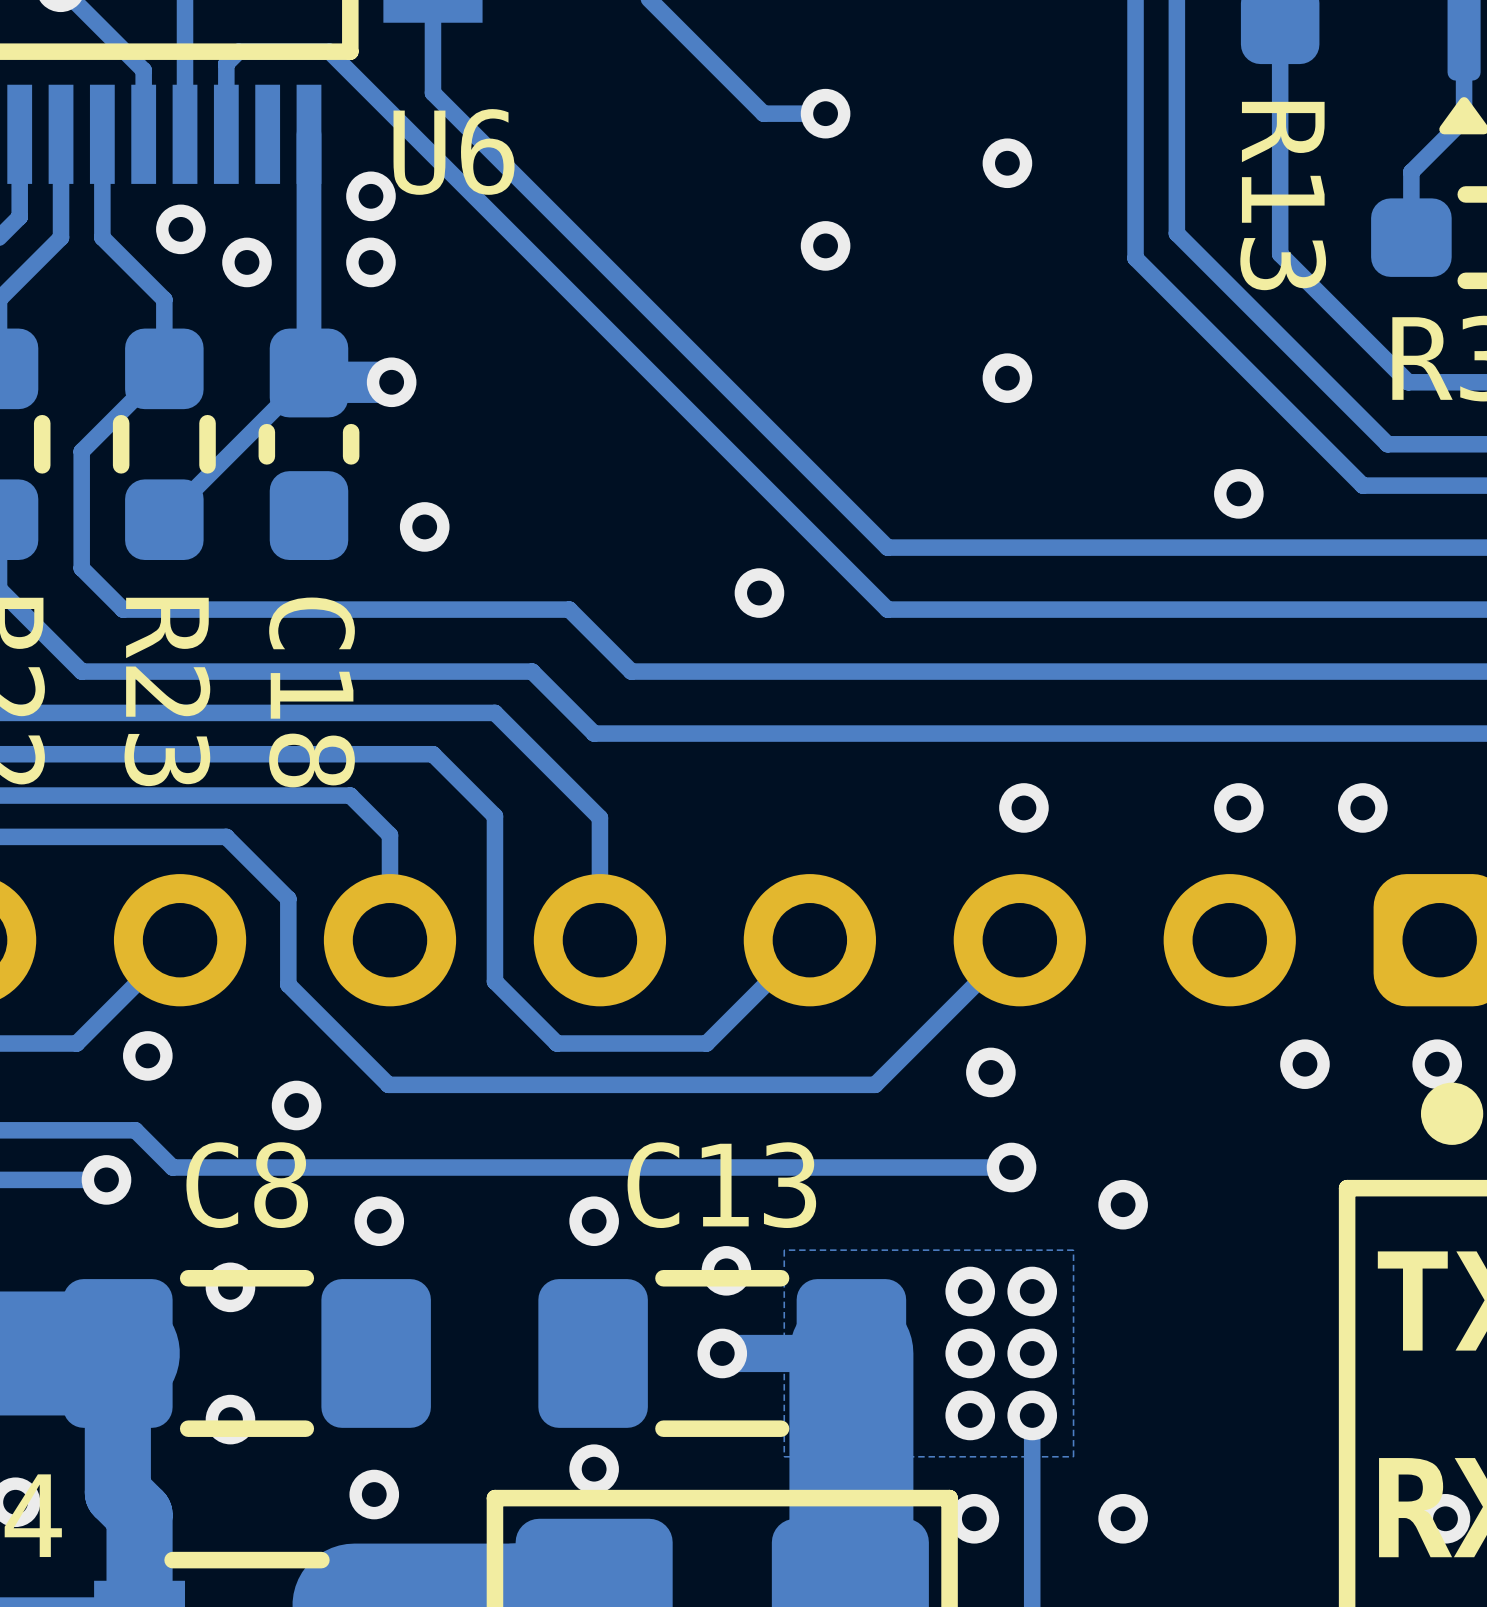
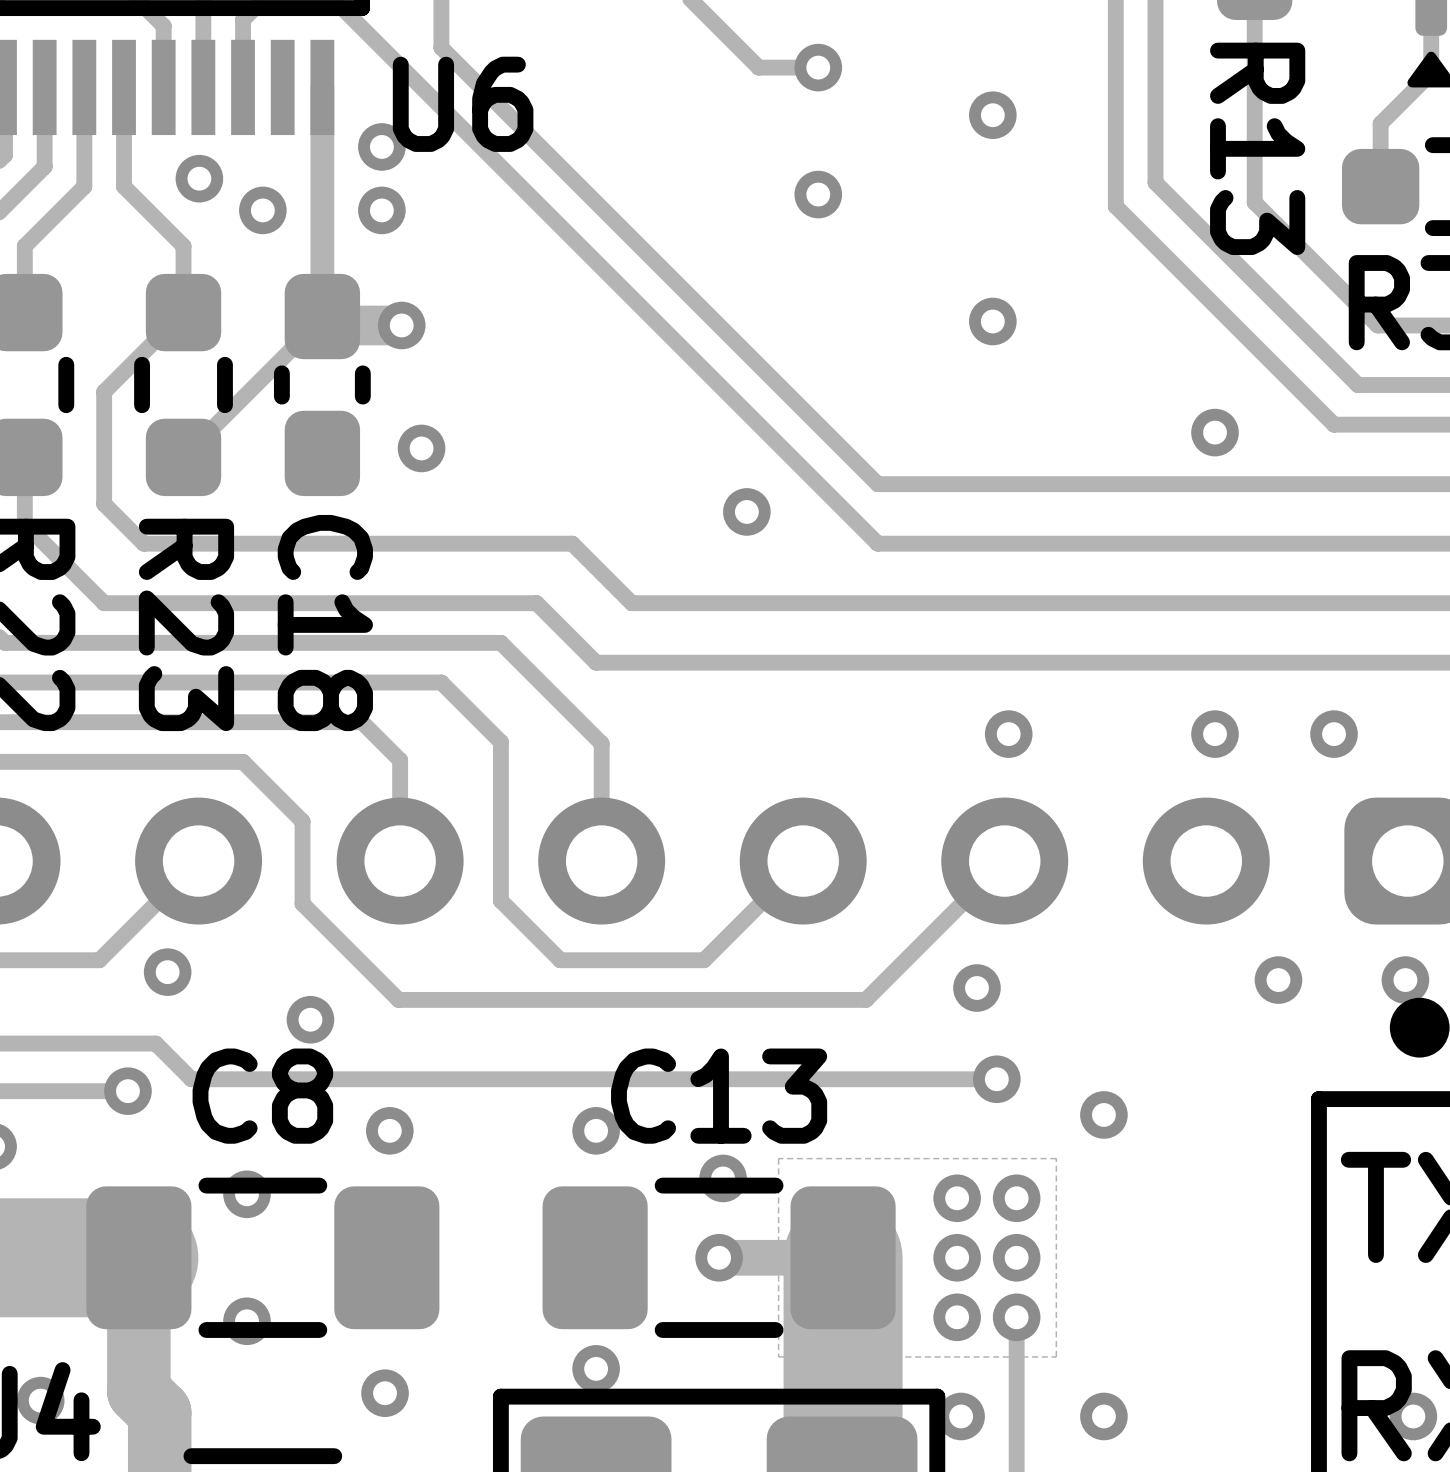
via position: (424, 526) -> (421, 448)
via position: (759, 593) -> (746, 511)

